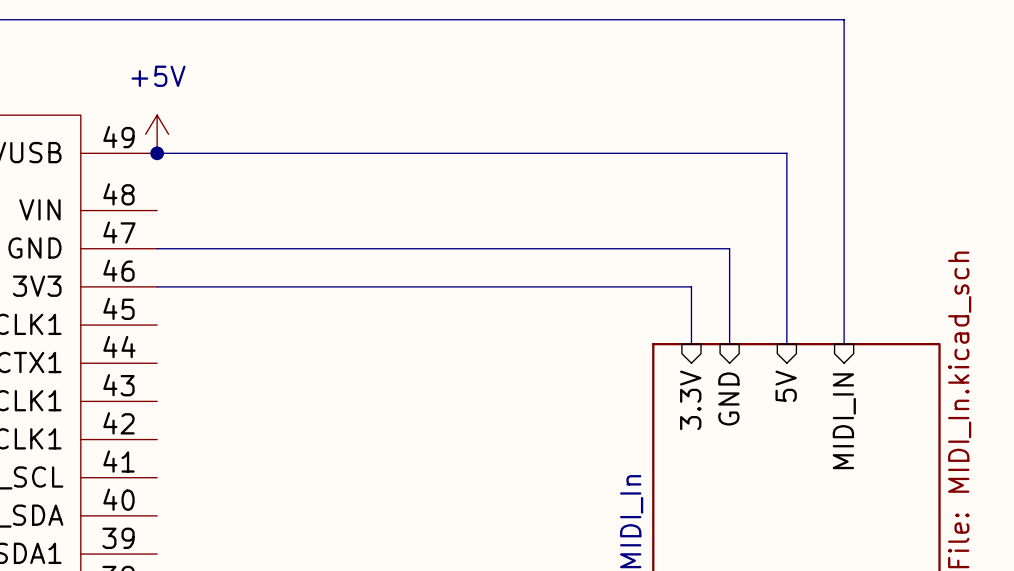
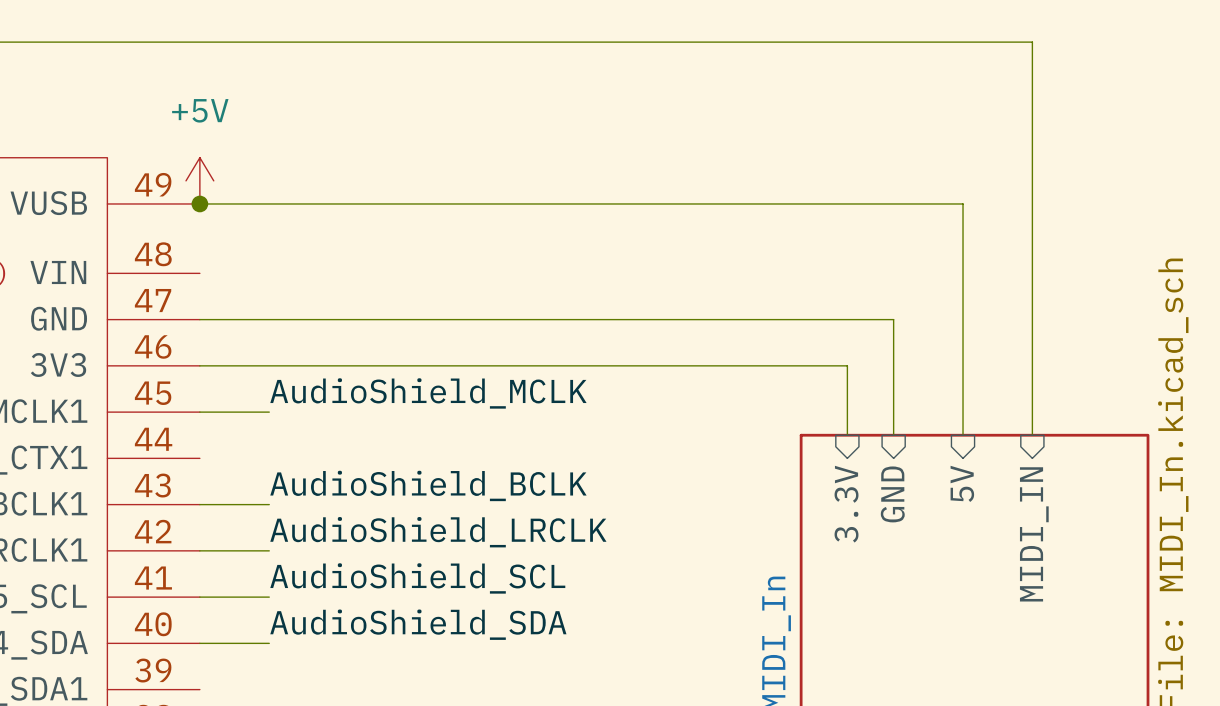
label: none -> AudioShield_MCLK (428, 393)
wire: none -> (199, 412) (269, 412)
label: none -> AudioShield_BCLK (428, 485)
wire: none -> (199, 504) (269, 504)
label: none -> AudioShield_LRCLK (438, 532)
wire: none -> (199, 550) (269, 550)
label: none -> AudioShield_SCL (417, 578)
wire: none -> (199, 597) (269, 597)
label: none -> AudioShield_SDA (418, 624)
wire: none -> (199, 643) (269, 643)

